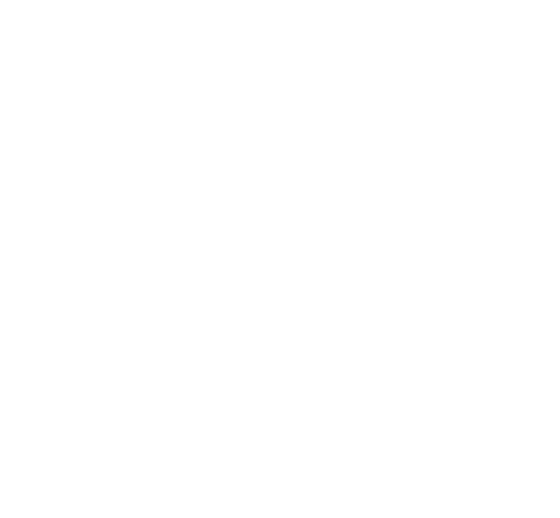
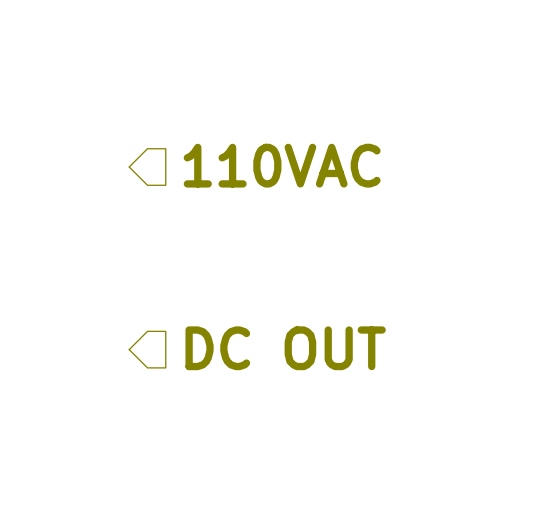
hierarchical label: none -> 110VAC (282, 165)
hierarchical label: none -> DC OUT (285, 348)

